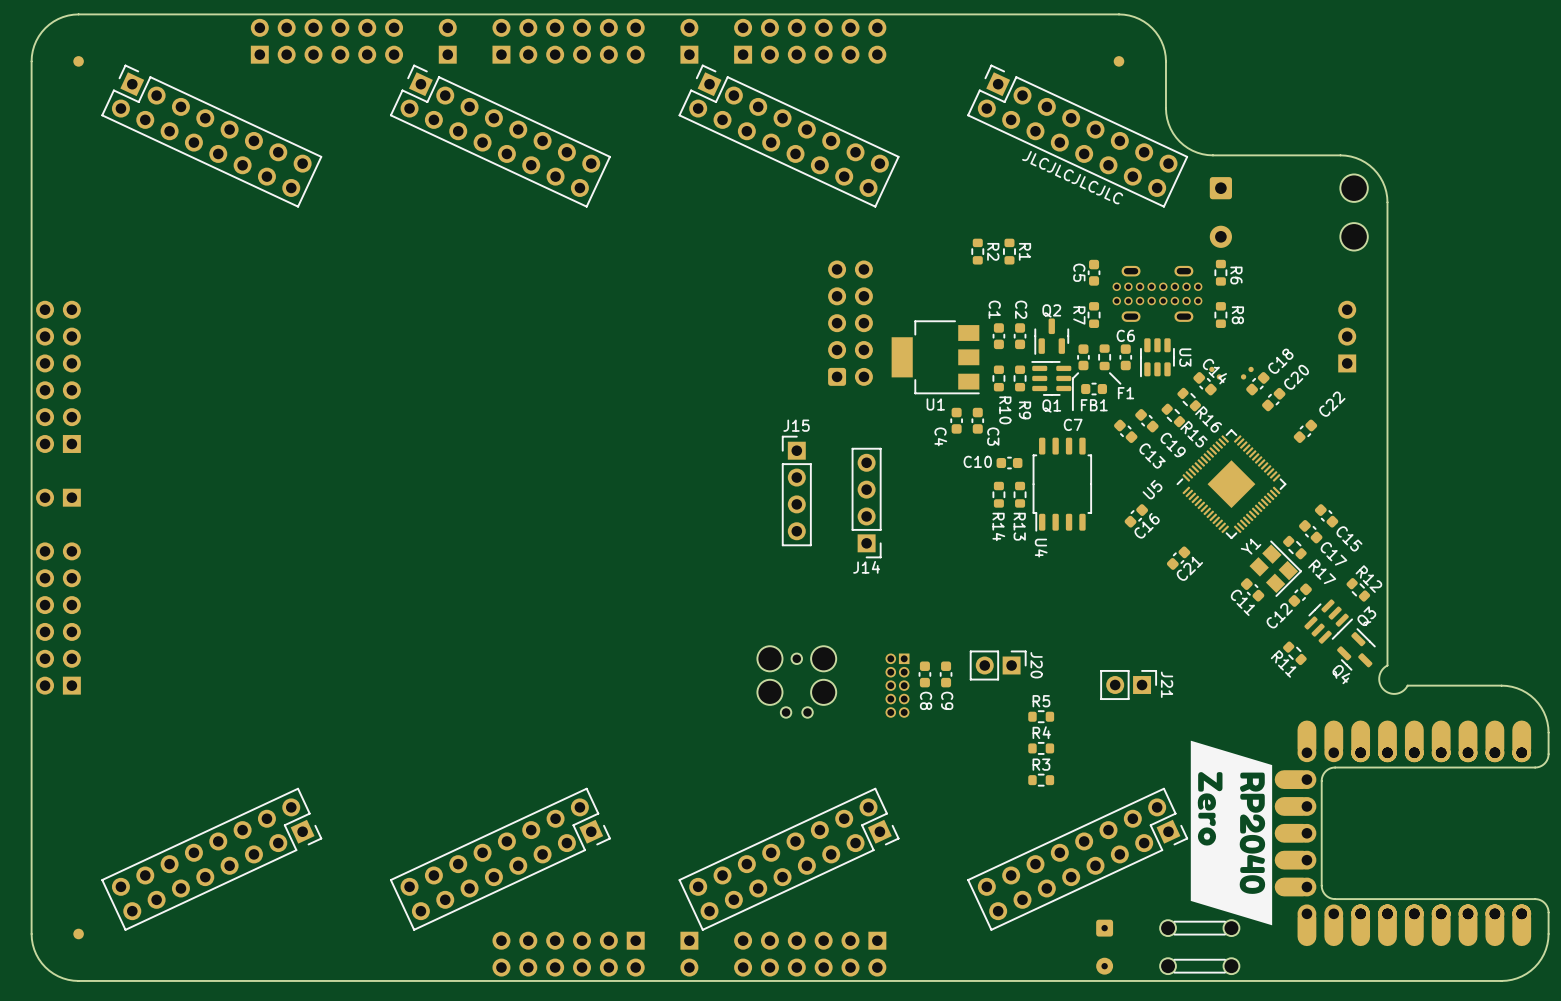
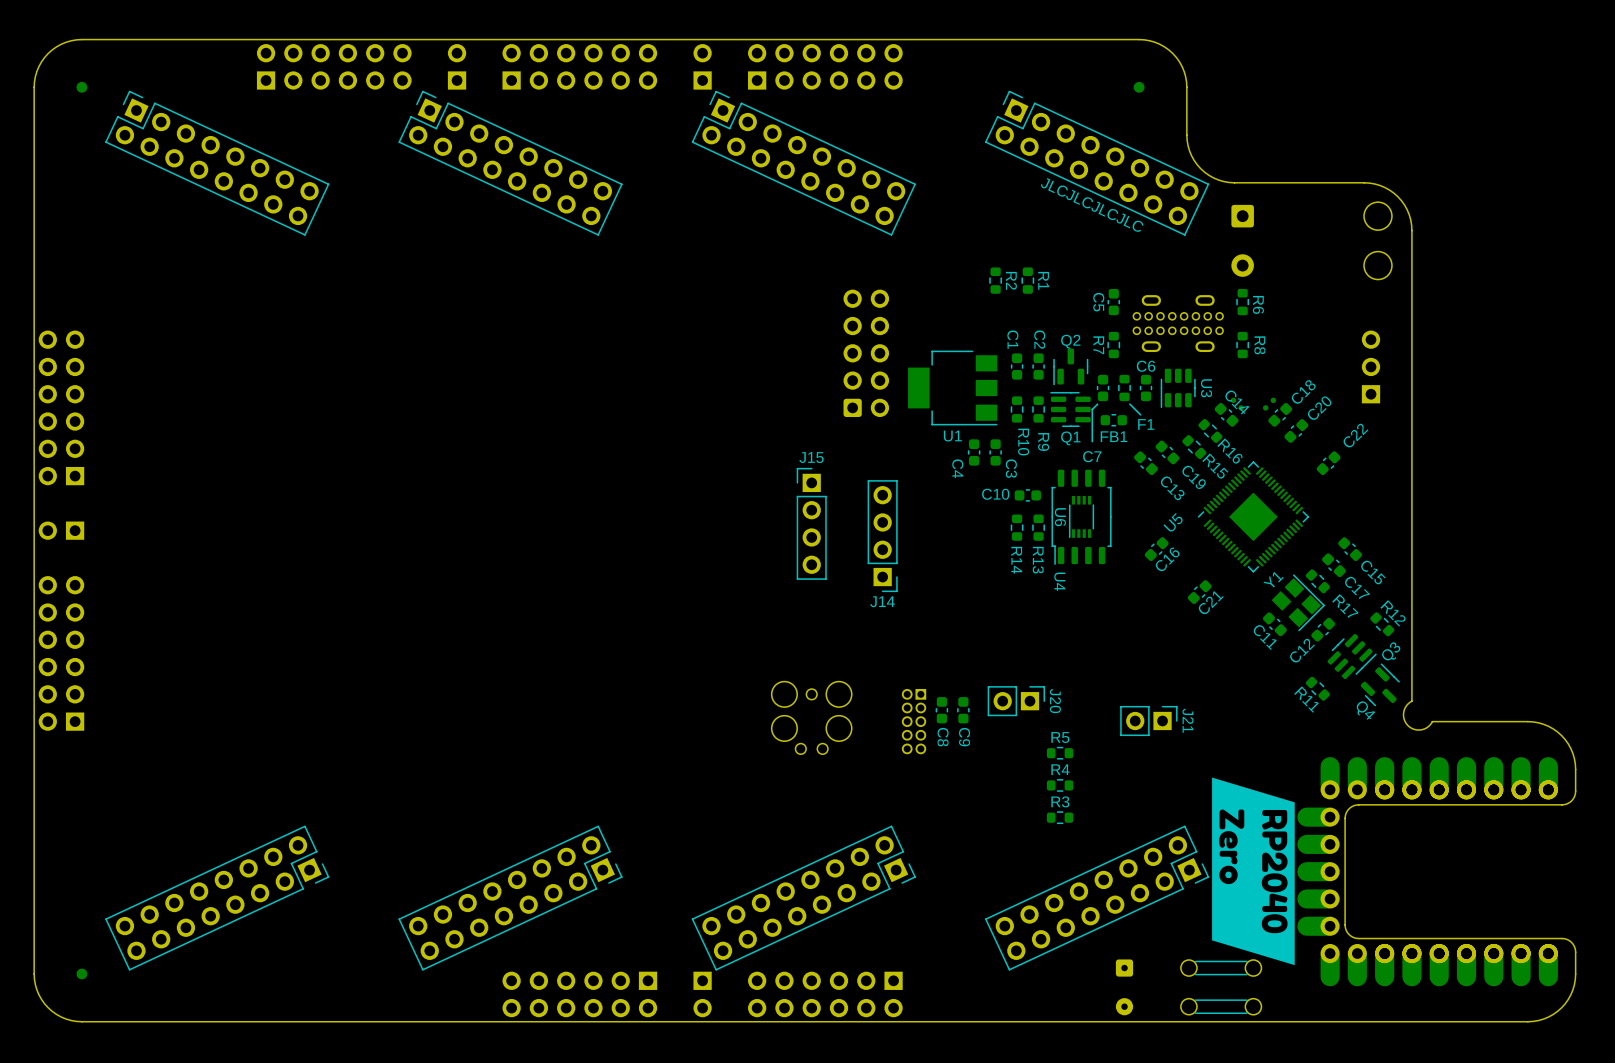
U6: none -> (1081, 516)

